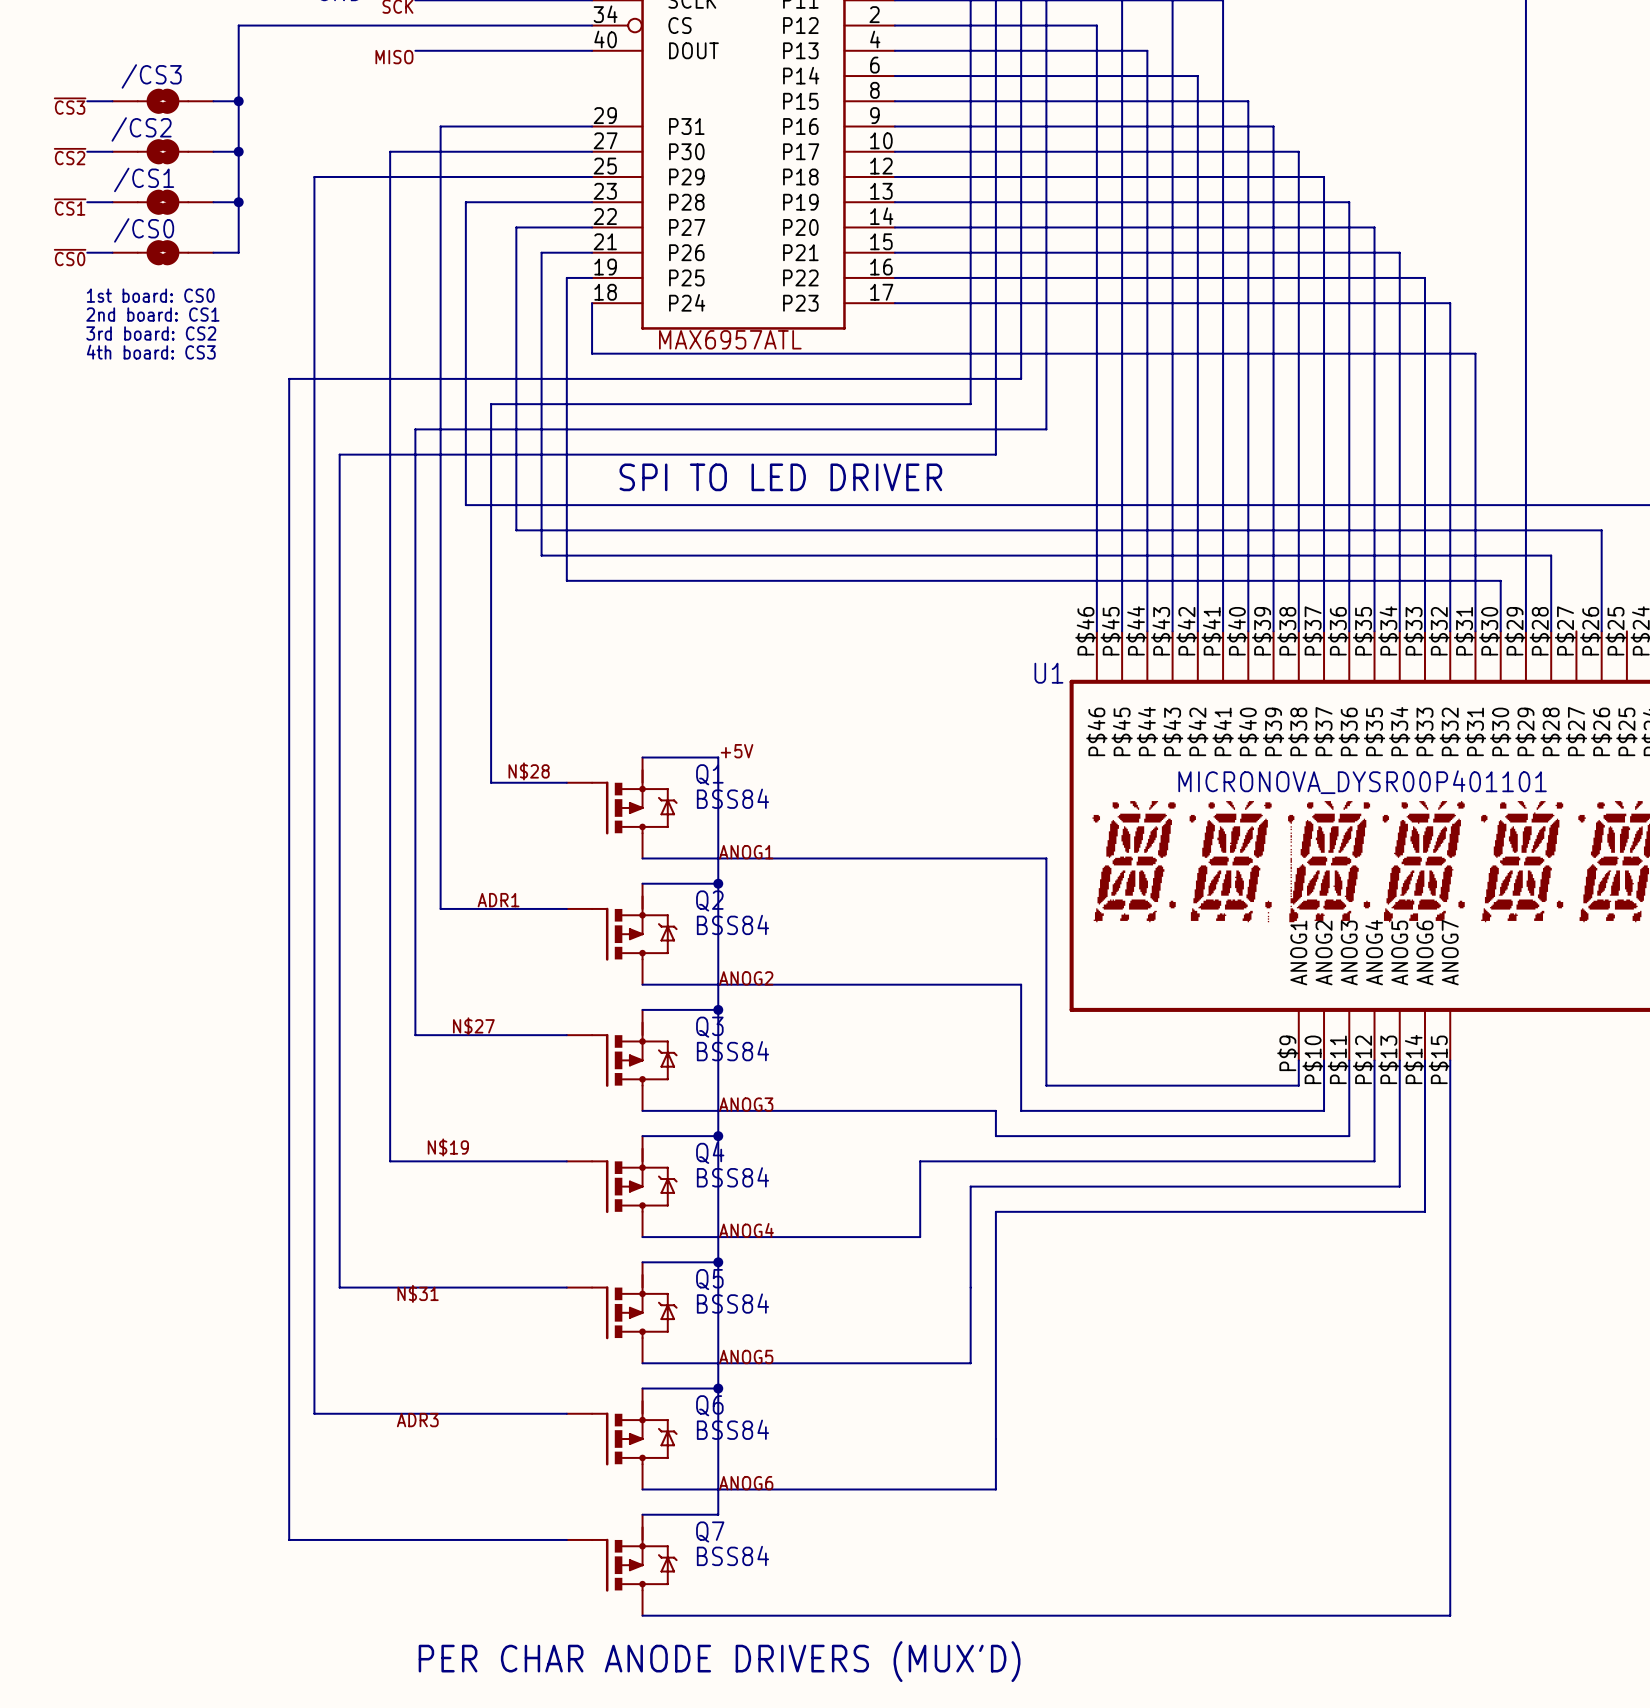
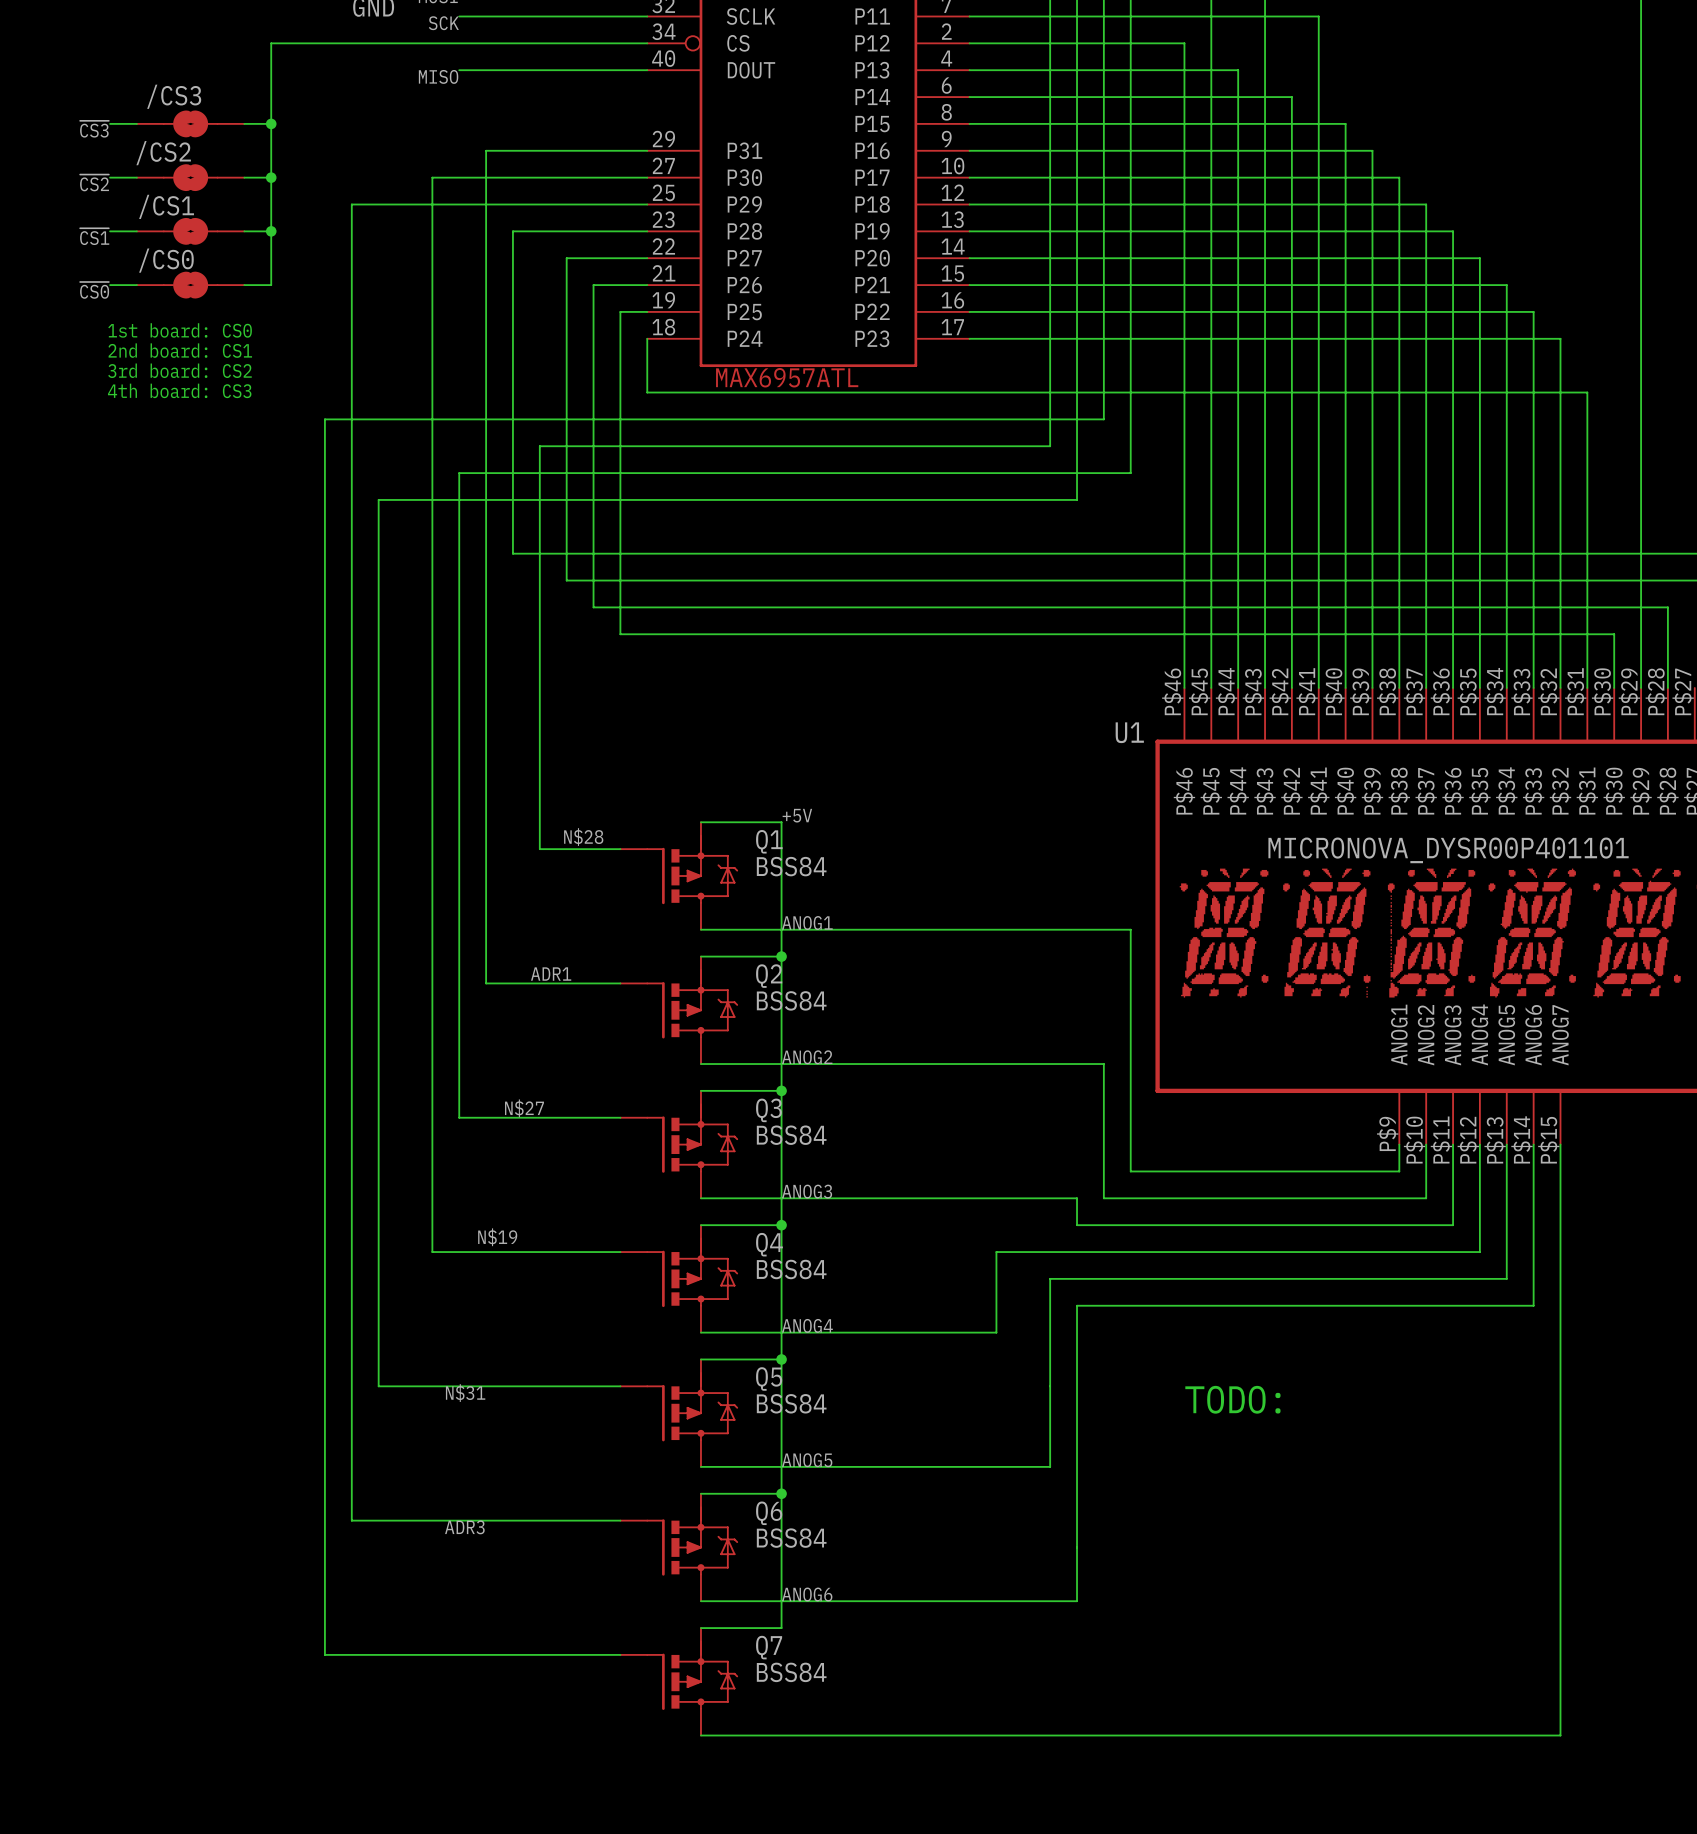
text: SPI TO LED DRIVER (780, 477) -> none
text: none -> TODO: (1232, 1399)
text: PER CHAR ANODE DRIVERS (MUX'D) (719, 1661) -> none

